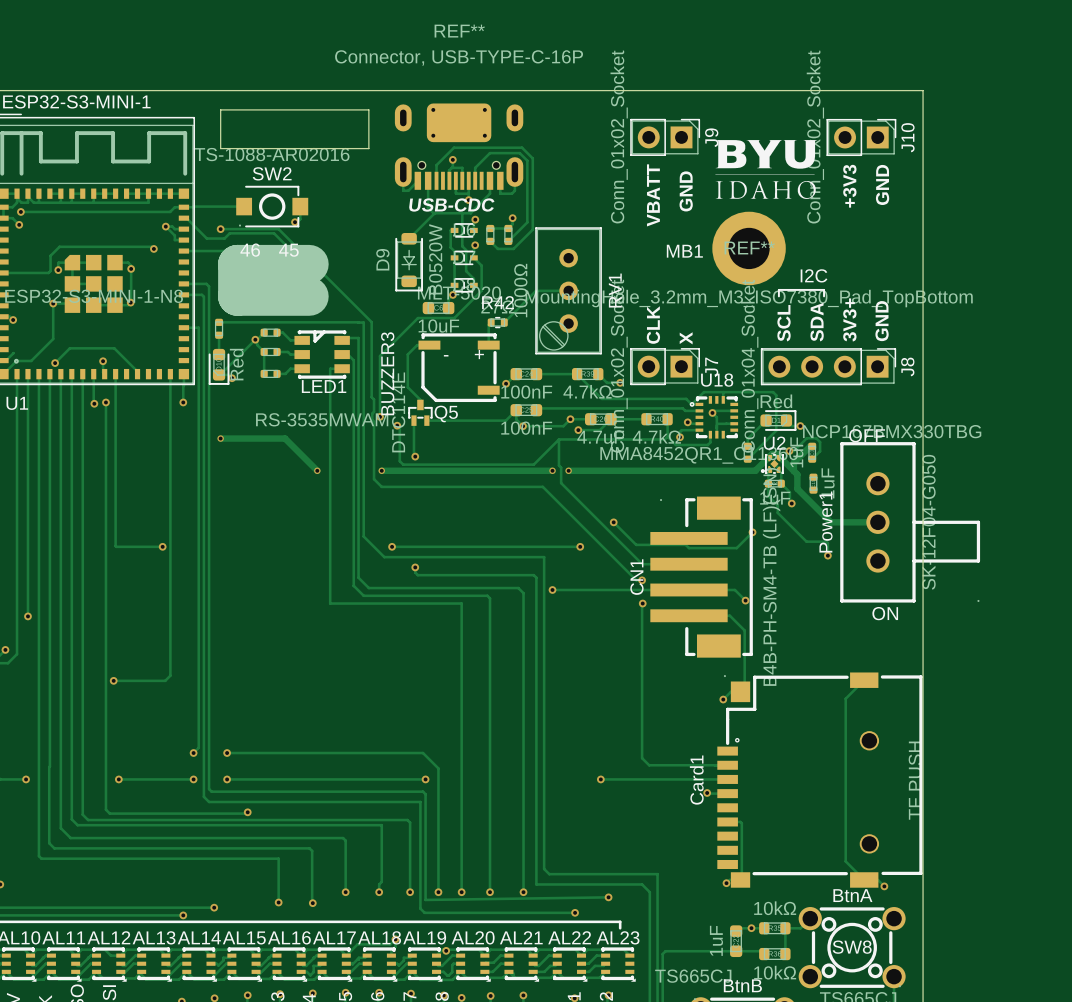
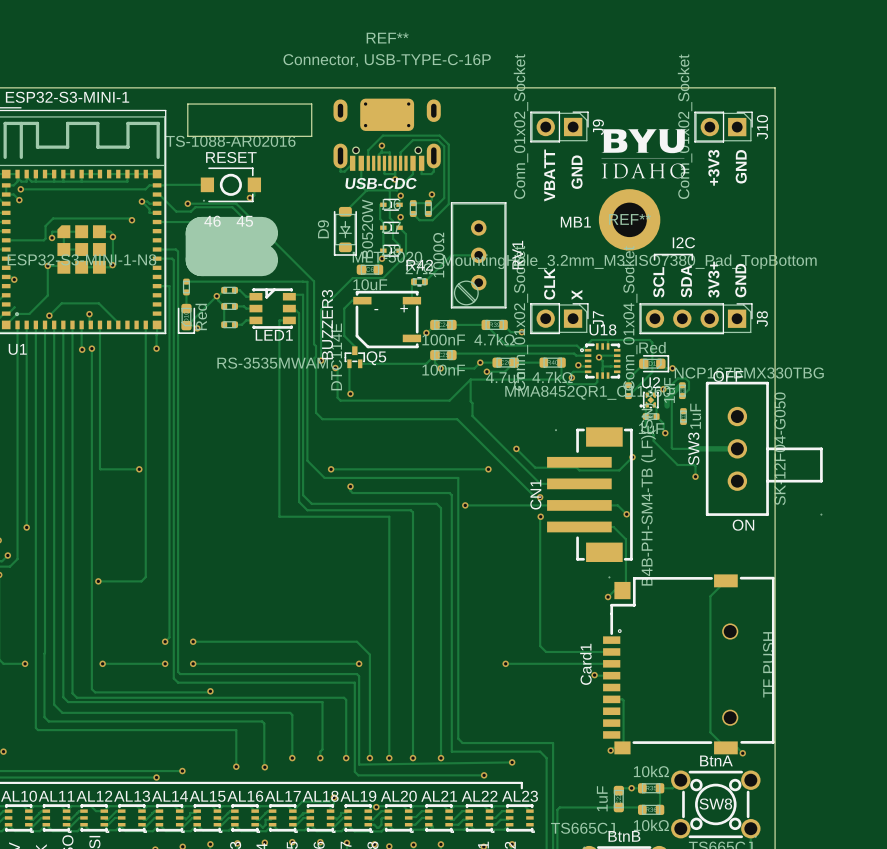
SW2 name: SW2 (272, 173) -> RESET (231, 157)
track: (220, 438) (285, 438) (317, 470) -> none
via: (220, 438) -> none
via: (317, 470) -> none
track: (381, 470) (552, 470) -> none
via: (381, 470) -> none
via: (552, 470) -> none
track: (568, 470) (755, 470) -> none
via: (568, 470) -> none
track: (755, 470) (772, 454) (776, 454) (797, 474) (797, 488) (830, 522) -> (671, 395) (671, 447) (698, 448)
Power1 name: Power1 (825, 522) -> SW3 (693, 448)

